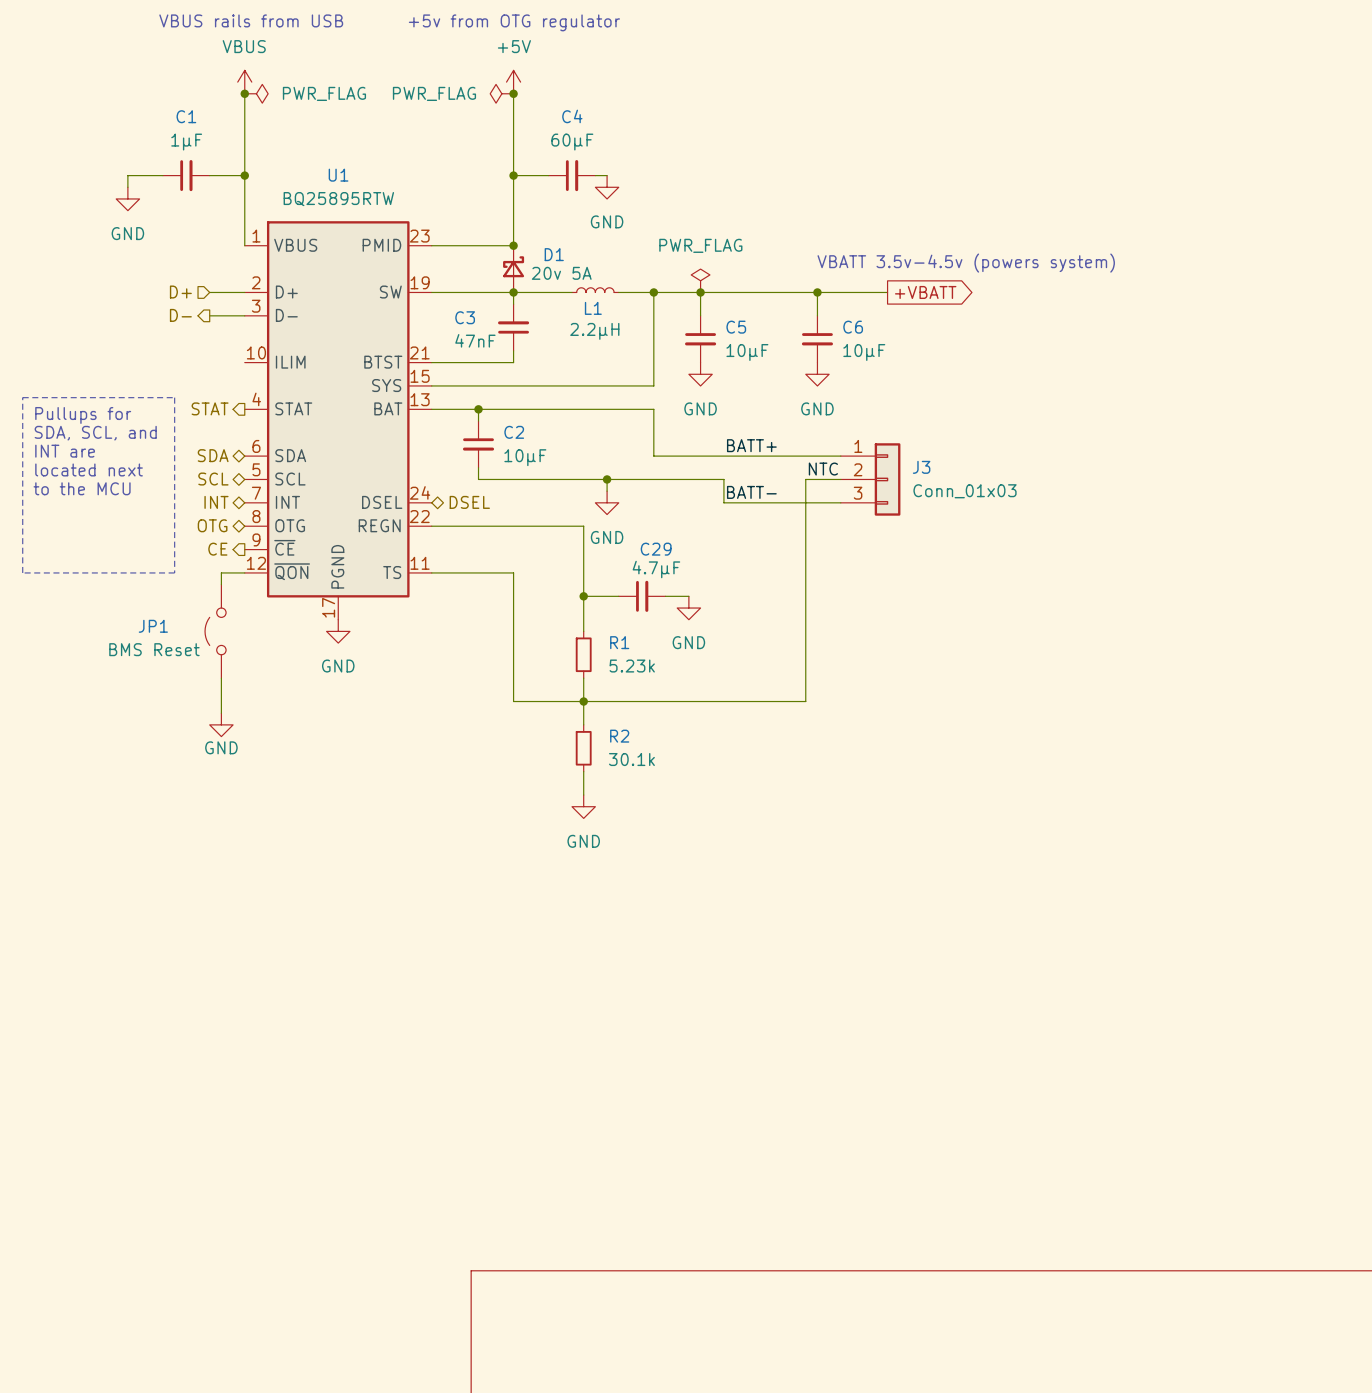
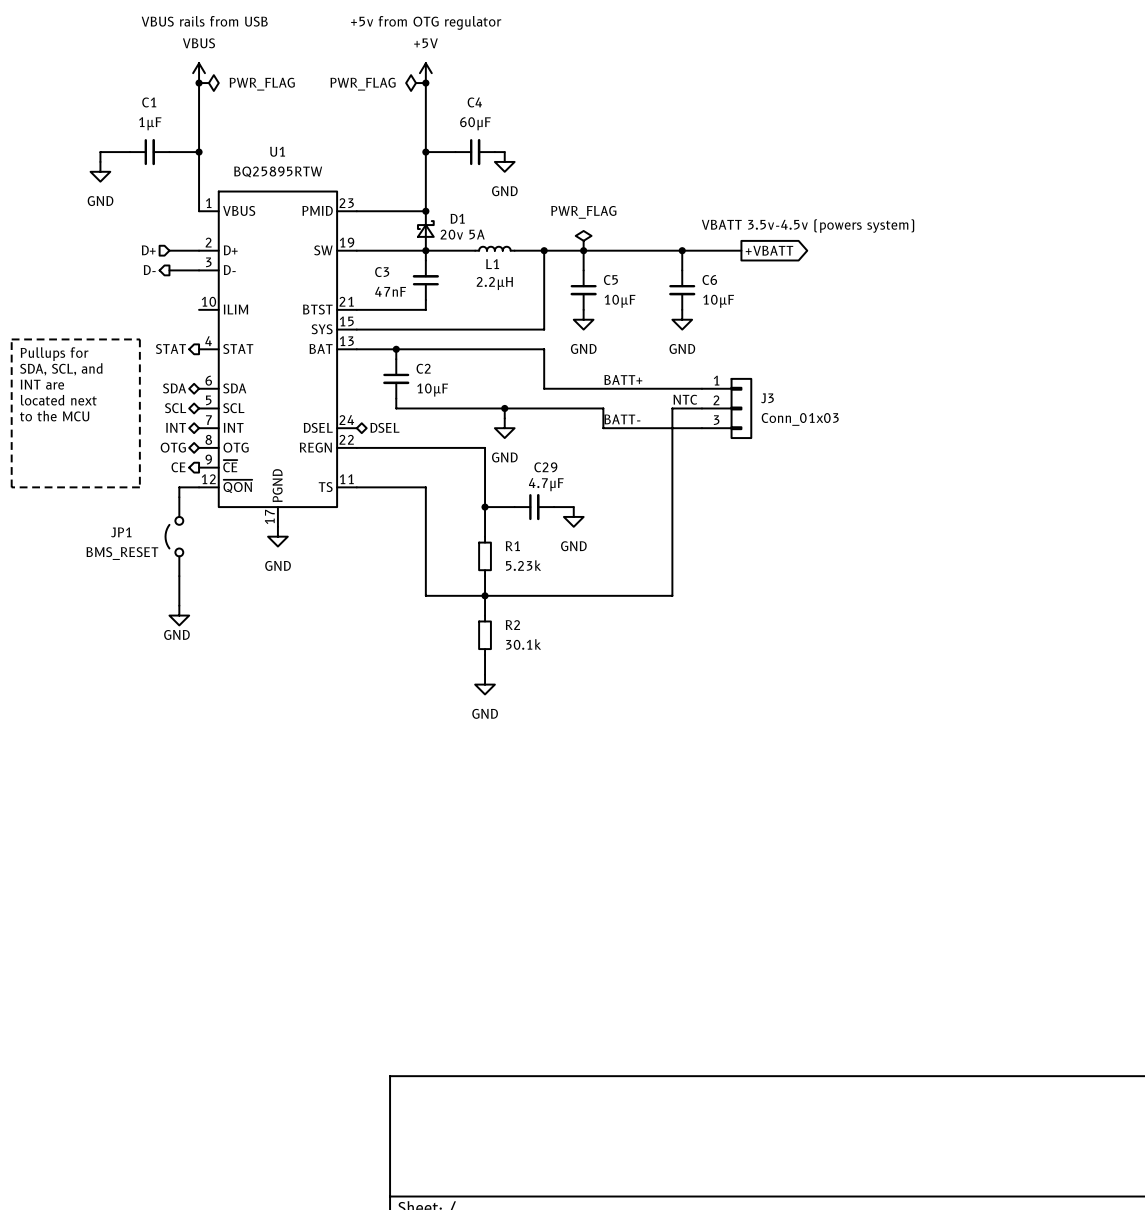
JP1 value: BMS Reset (154, 649) -> BMS_RESET (122, 553)

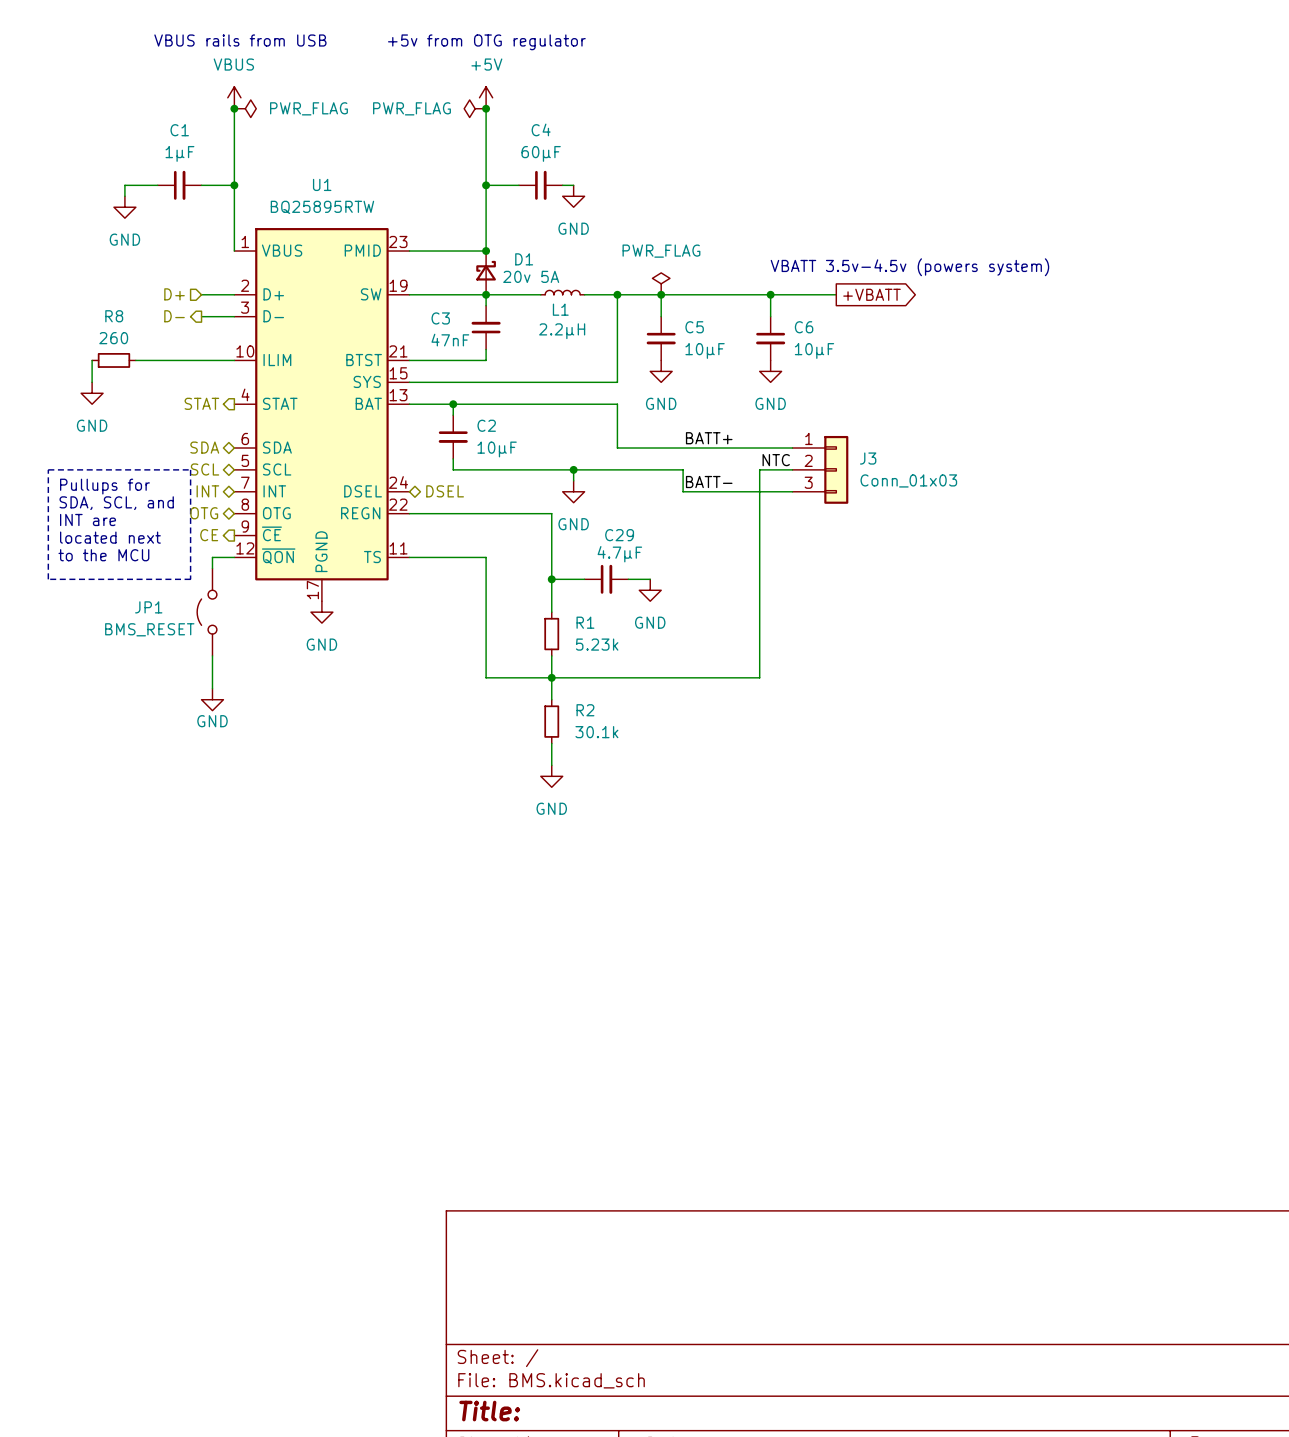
wire: none -> (92, 360) (92, 382)
R8: none -> 260 (113, 360)
wire: none -> (135, 360) (234, 360)
line: (11, 339) (139, 339) (139, 487) (11, 487) (11, 339) -> none
power symbol: none -> GND (92, 393)
text position: Pullups for (54, 354) -> Pullups for (104, 486)
text position: SDA, SCL, and (61, 369) -> SDA, SCL, and (116, 503)
text position: INT are (42, 384) -> INT are (88, 519)
text position: located next (58, 400) -> located next (110, 537)
line: none -> (48, 469) (190, 469) (190, 579) (48, 579) (48, 469)
text position: to the MCU (54, 416) -> to the MCU (103, 555)

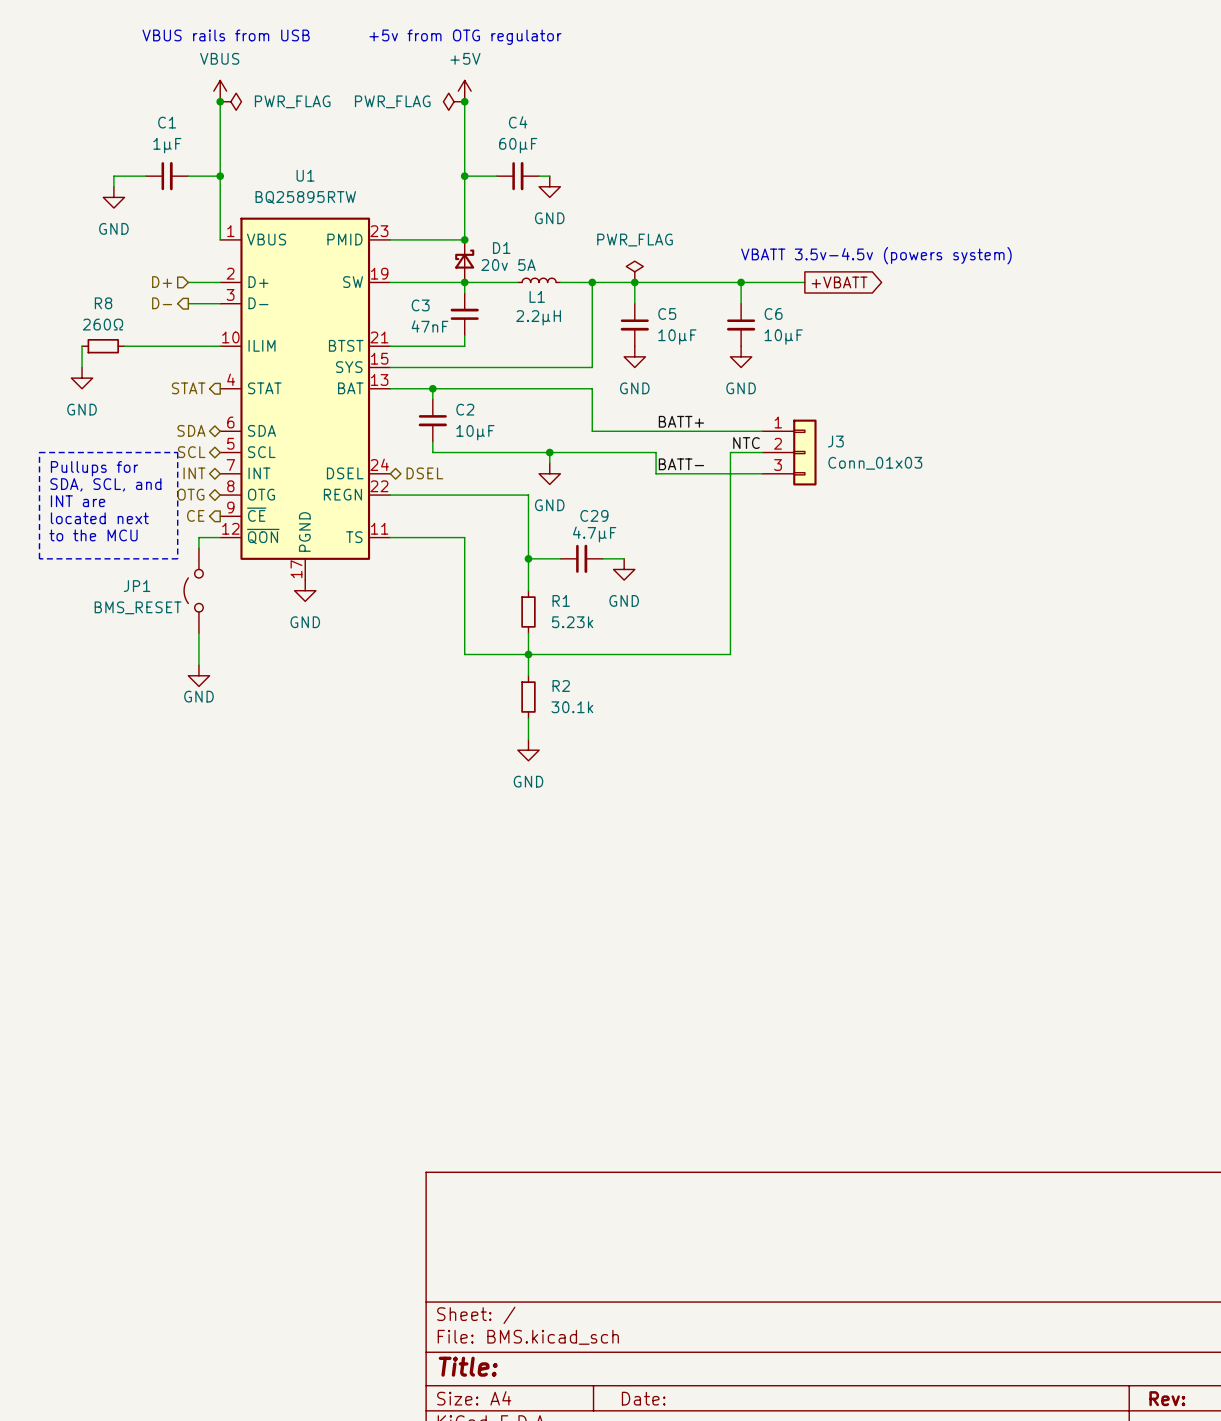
R8 value: 260 (113, 338) -> 260Ω (103, 324)

